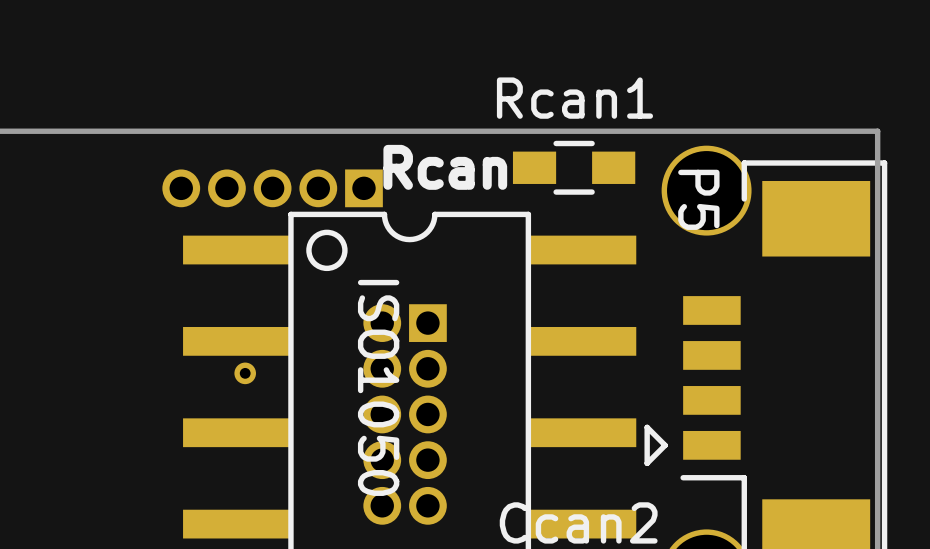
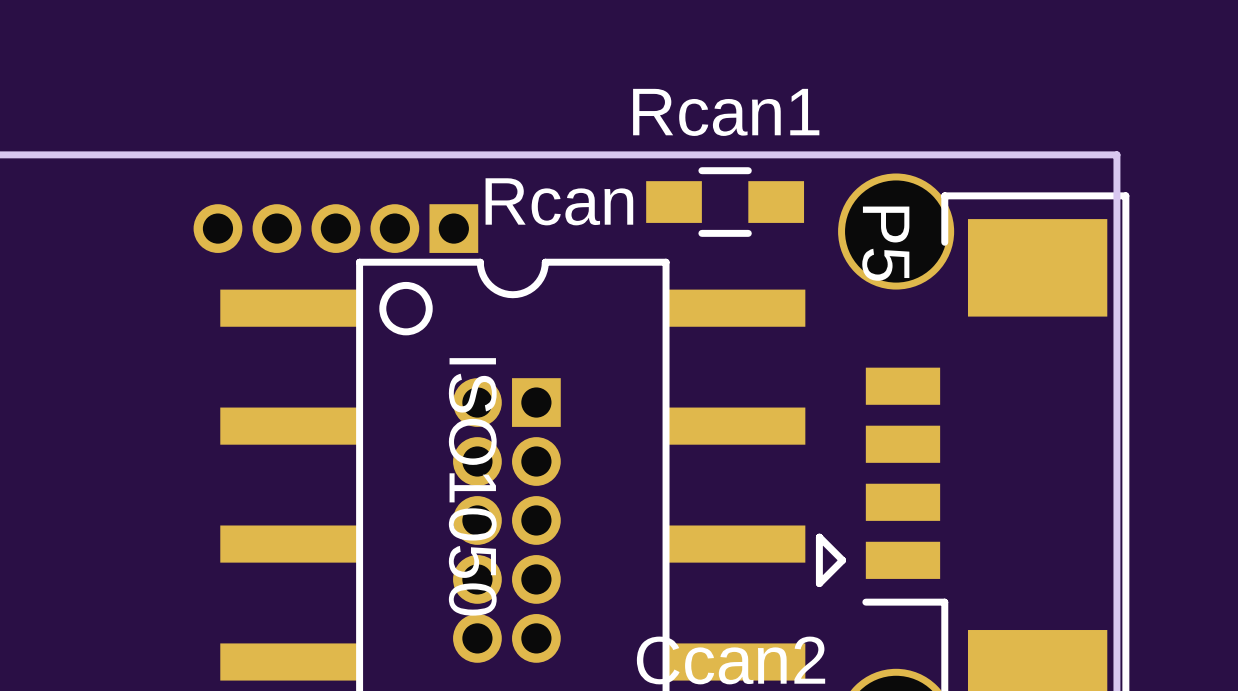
part: (245, 373) -> none

